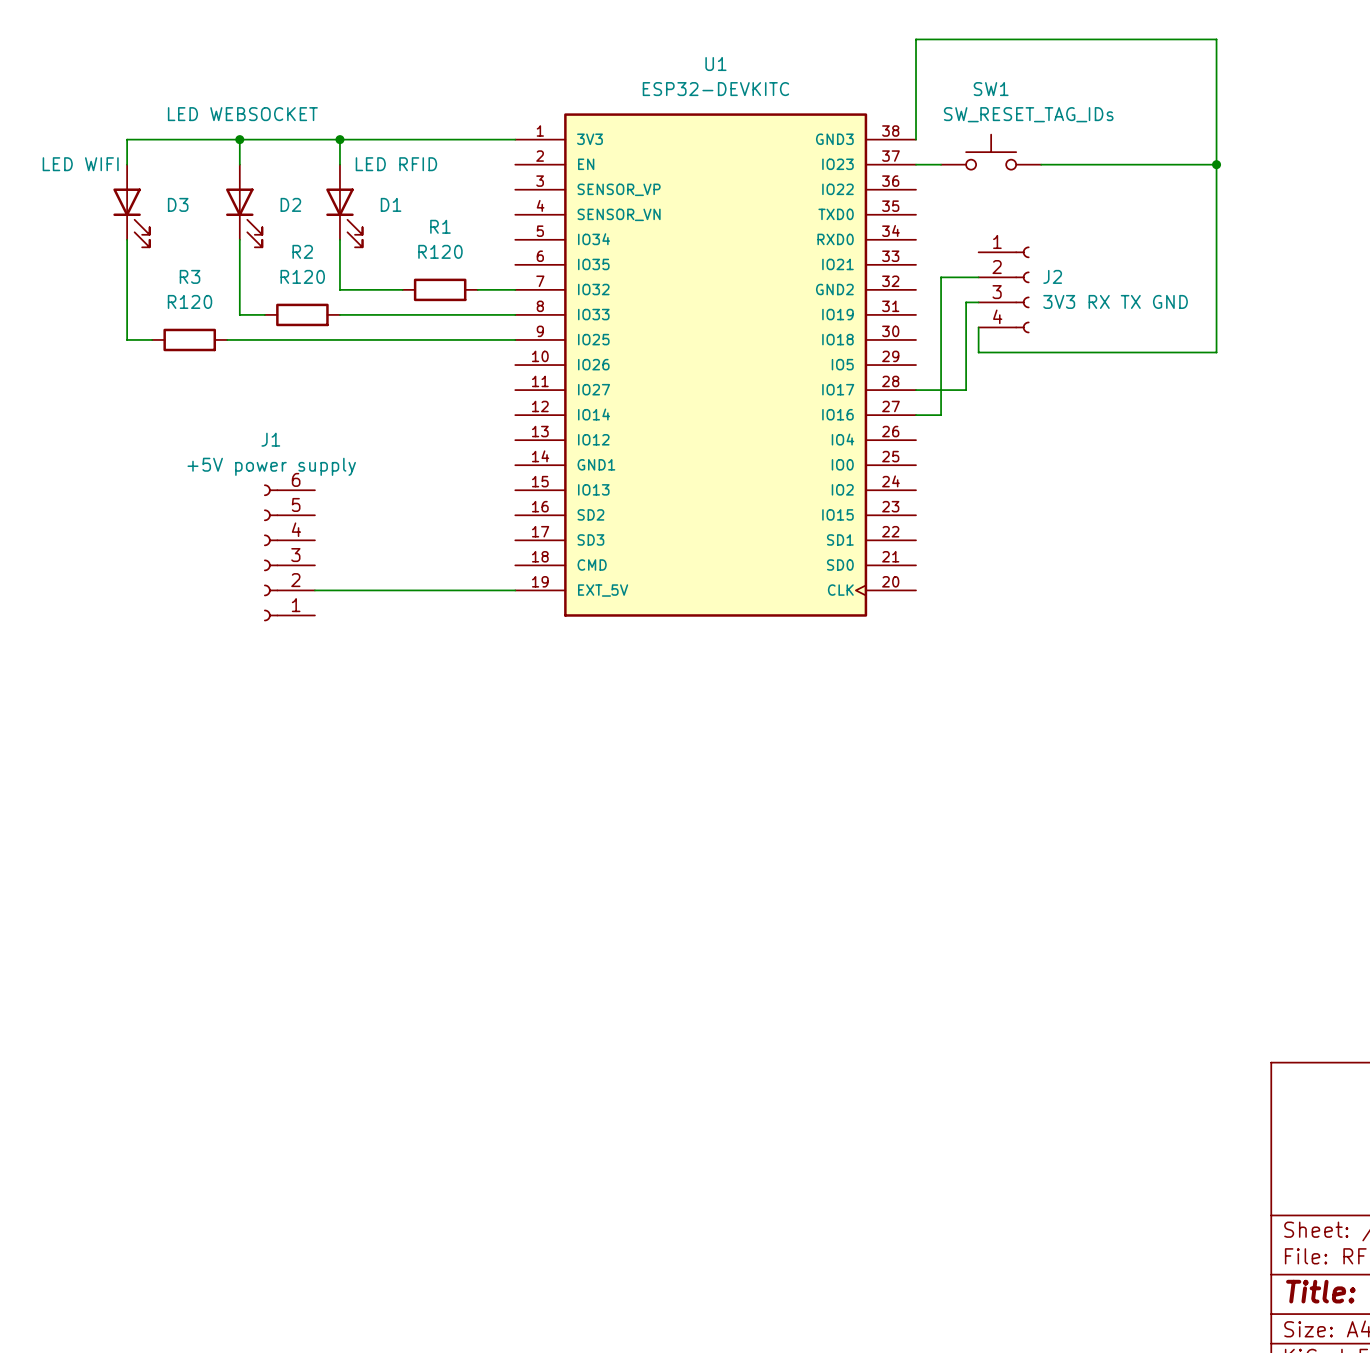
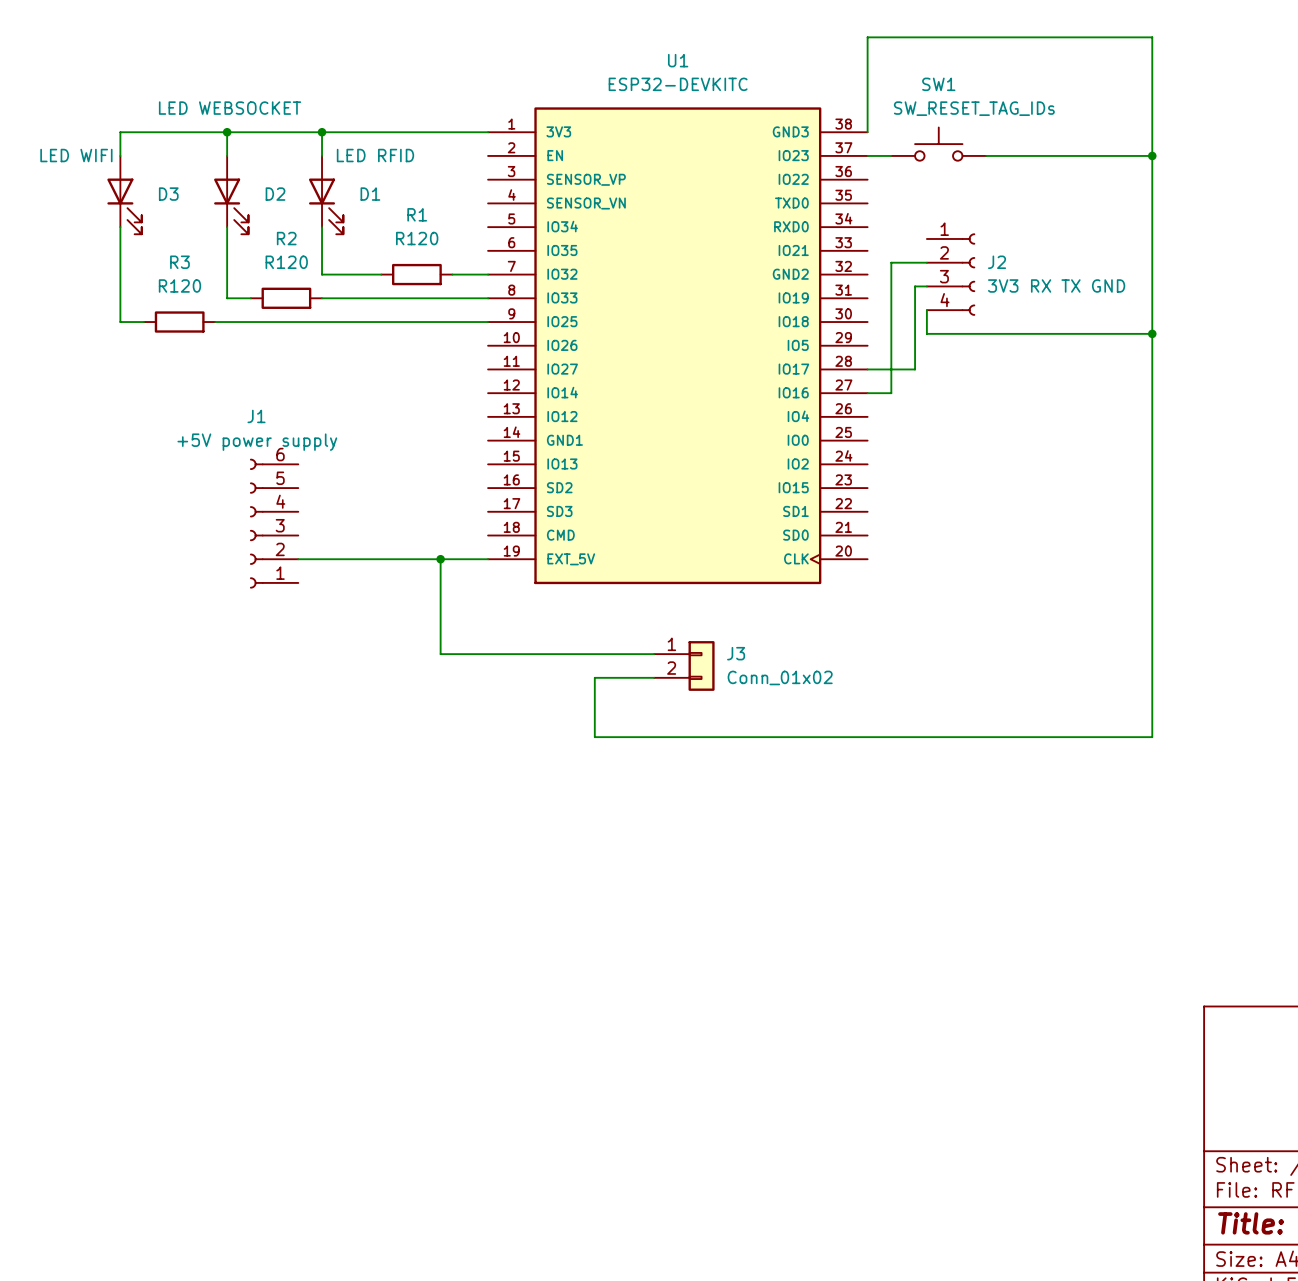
wire: none -> (1152, 333) (1152, 737) (594, 737) (594, 677) (654, 677)
junction: none -> (1152, 333)
wire: none -> (440, 559) (440, 654) (654, 654)
junction: none -> (440, 559)
J3: none -> Conn_01x02 (684, 665)

